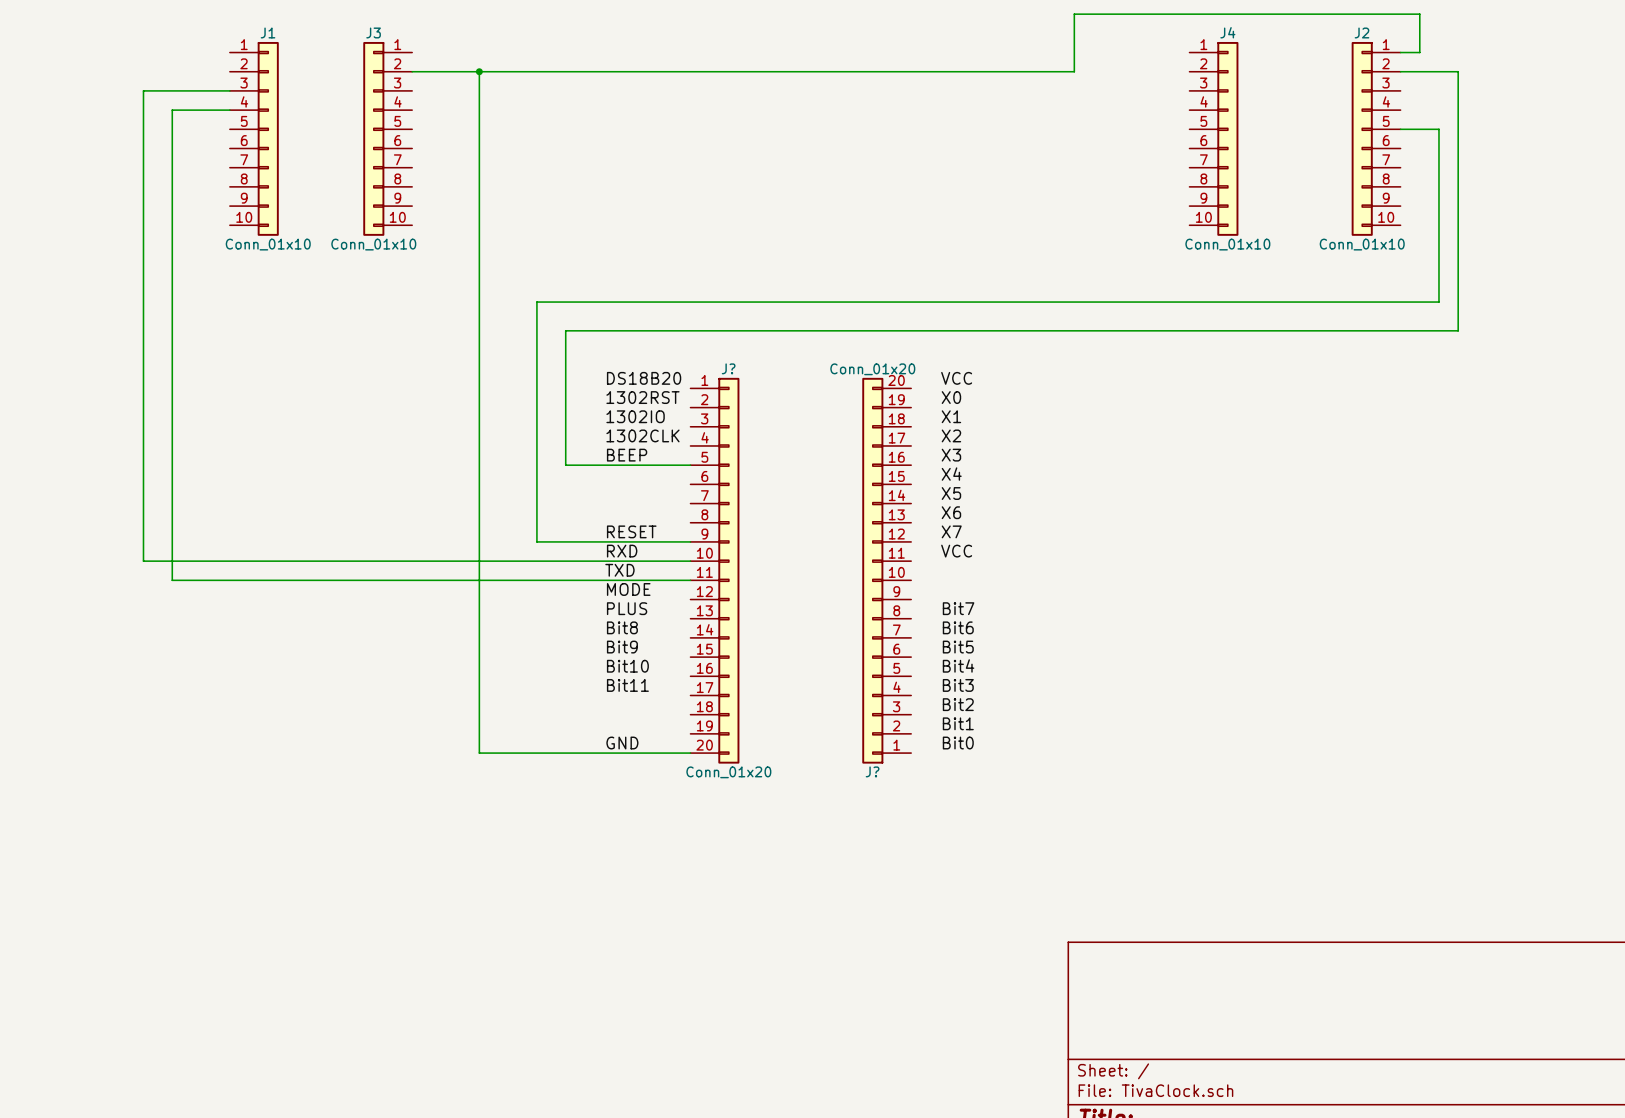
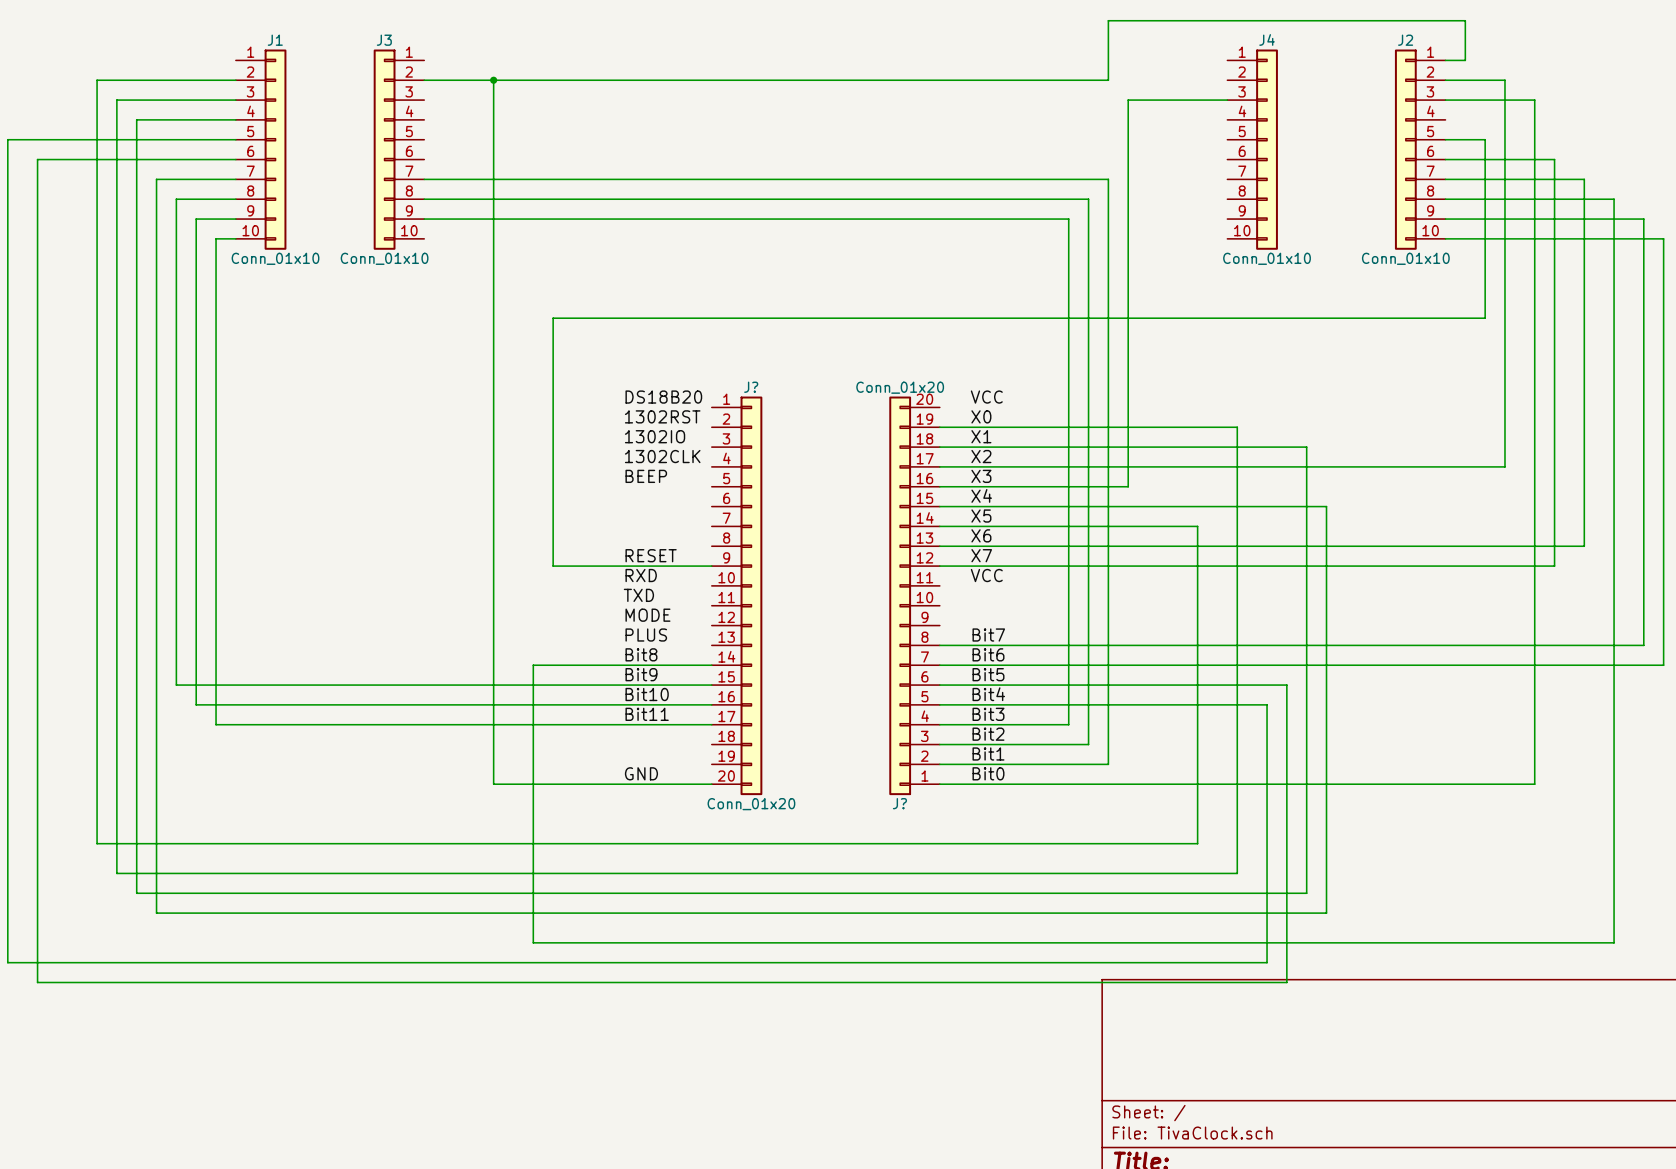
wire: none -> (235, 80) (97, 80) (97, 843) (1197, 843) (1197, 526) (939, 526)
wire: (143, 90) (143, 561) (690, 561) -> (146, 100) (116, 100) (116, 873) (1237, 873) (1237, 427) (939, 427)
wire: none -> (1227, 100) (1128, 100) (1128, 486) (939, 486)
wire: none -> (1445, 100) (1534, 100) (1534, 784) (939, 784)
wire: (172, 110) (172, 186) -> (235, 199) (176, 199)
wire: none -> (176, 119) (136, 119) (136, 893) (1306, 893) (1306, 447) (939, 447)
wire: none -> (235, 139) (7, 139) (7, 962) (1267, 962) (1267, 704) (939, 704)
wire: none -> (235, 159) (37, 159) (37, 982) (1286, 982) (1286, 685) (939, 685)
wire: none -> (1445, 159) (1554, 159) (1554, 566) (939, 566)
wire: none -> (235, 179) (156, 179) (156, 913) (1326, 913) (1326, 506) (939, 506)
wire: none -> (424, 179) (1108, 179) (1108, 764) (939, 764)
wire: none -> (1445, 179) (1584, 179) (1584, 546) (939, 546)
wire: none -> (424, 199) (1088, 199) (1088, 744) (939, 744)
wire: none -> (1445, 199) (1614, 199) (1614, 942) (533, 942) (533, 665) (711, 665)
wire: none -> (235, 219) (196, 219) (196, 704) (711, 704)
wire: none -> (424, 219) (1068, 219) (1068, 724) (939, 724)
wire: none -> (1445, 219) (1643, 219) (1643, 645) (939, 645)
wire: none -> (235, 238) (216, 238) (216, 724) (711, 724)
wire: none -> (1445, 238) (1663, 238) (1663, 665) (939, 665)
wire: (1458, 330) (565, 330) (565, 465) (690, 465) -> (1504, 347) (1504, 466) (939, 466)
wire: (172, 580) (690, 580) -> (176, 605) (176, 685) (711, 685)

